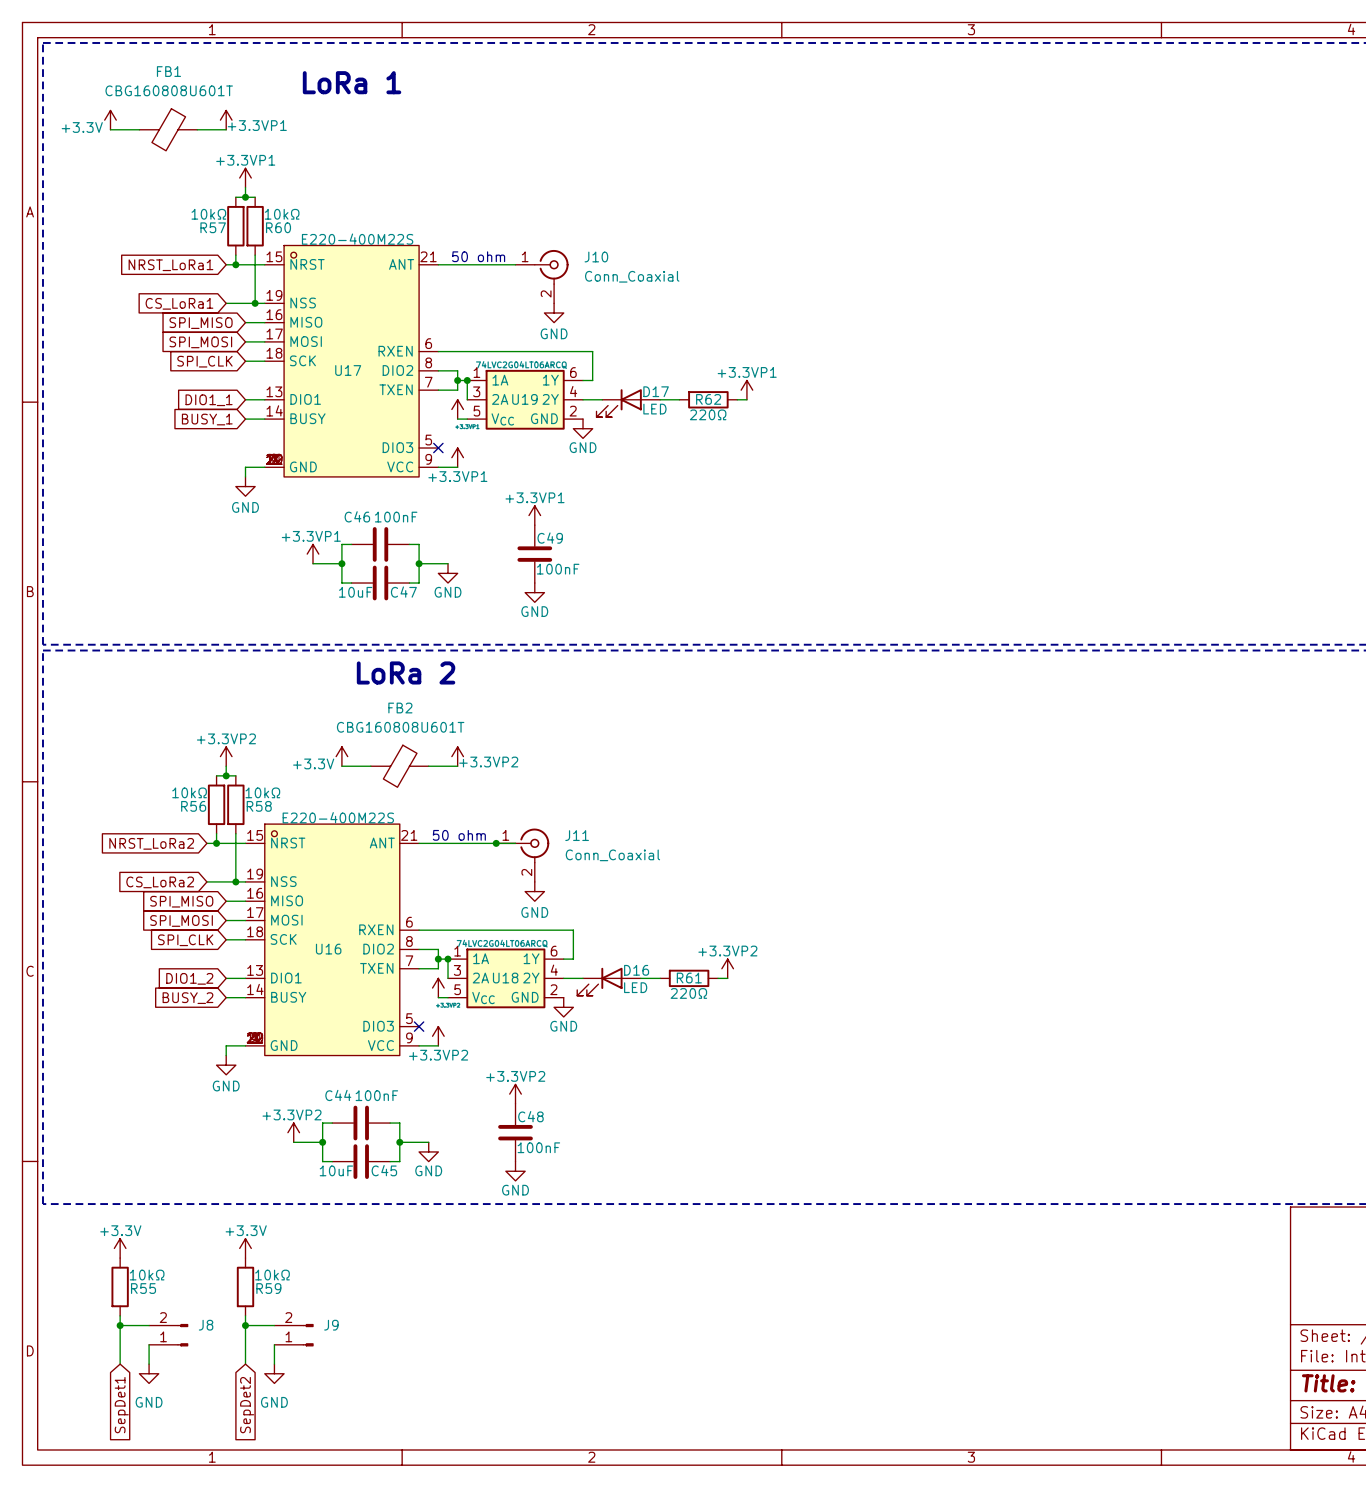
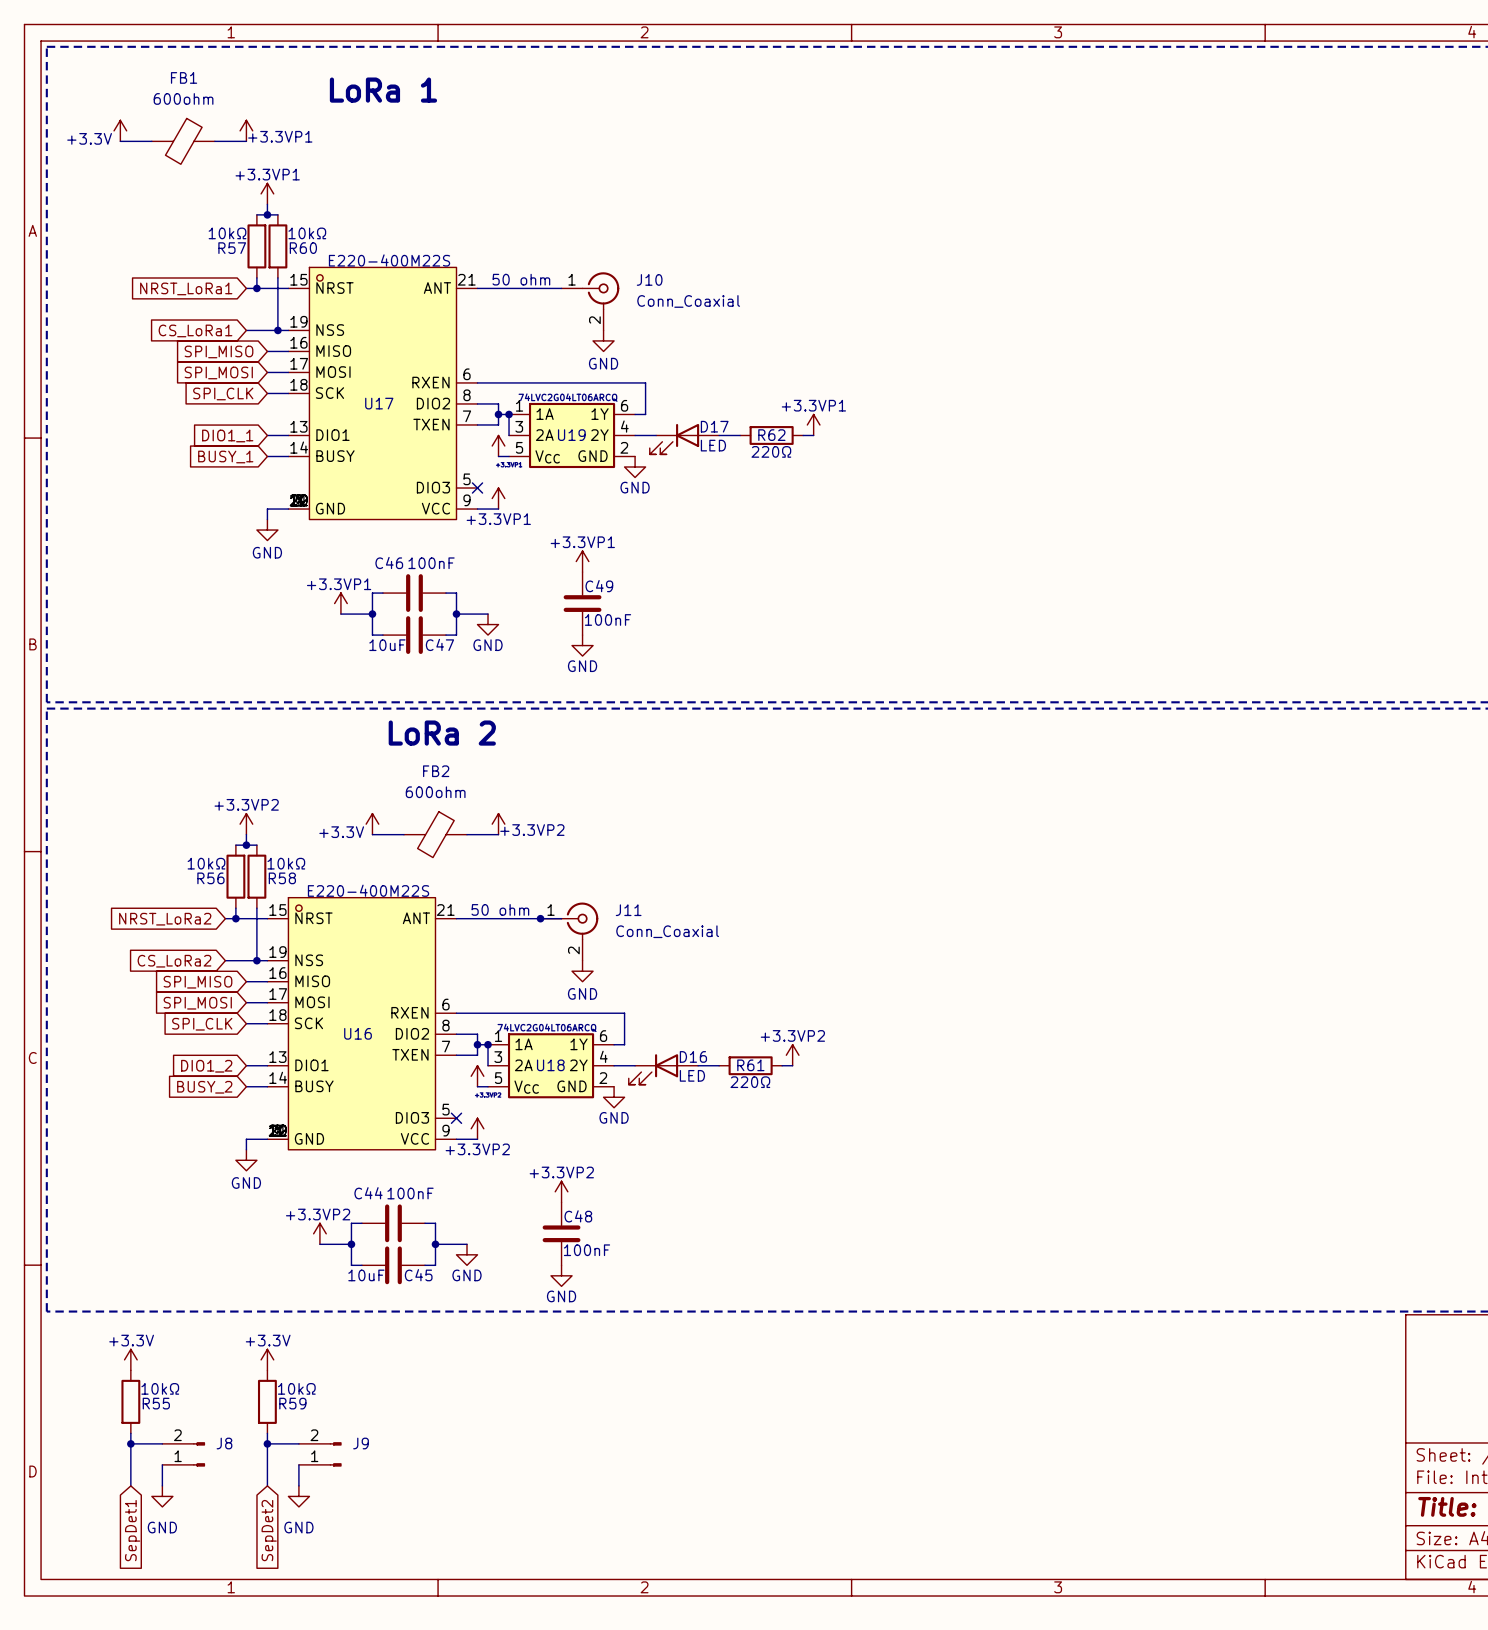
FB1 value: CBG160808U601T (169, 90) -> 600ohm (183, 98)
FB2 value: CBG160808U601T (400, 727) -> 600ohm (435, 792)

